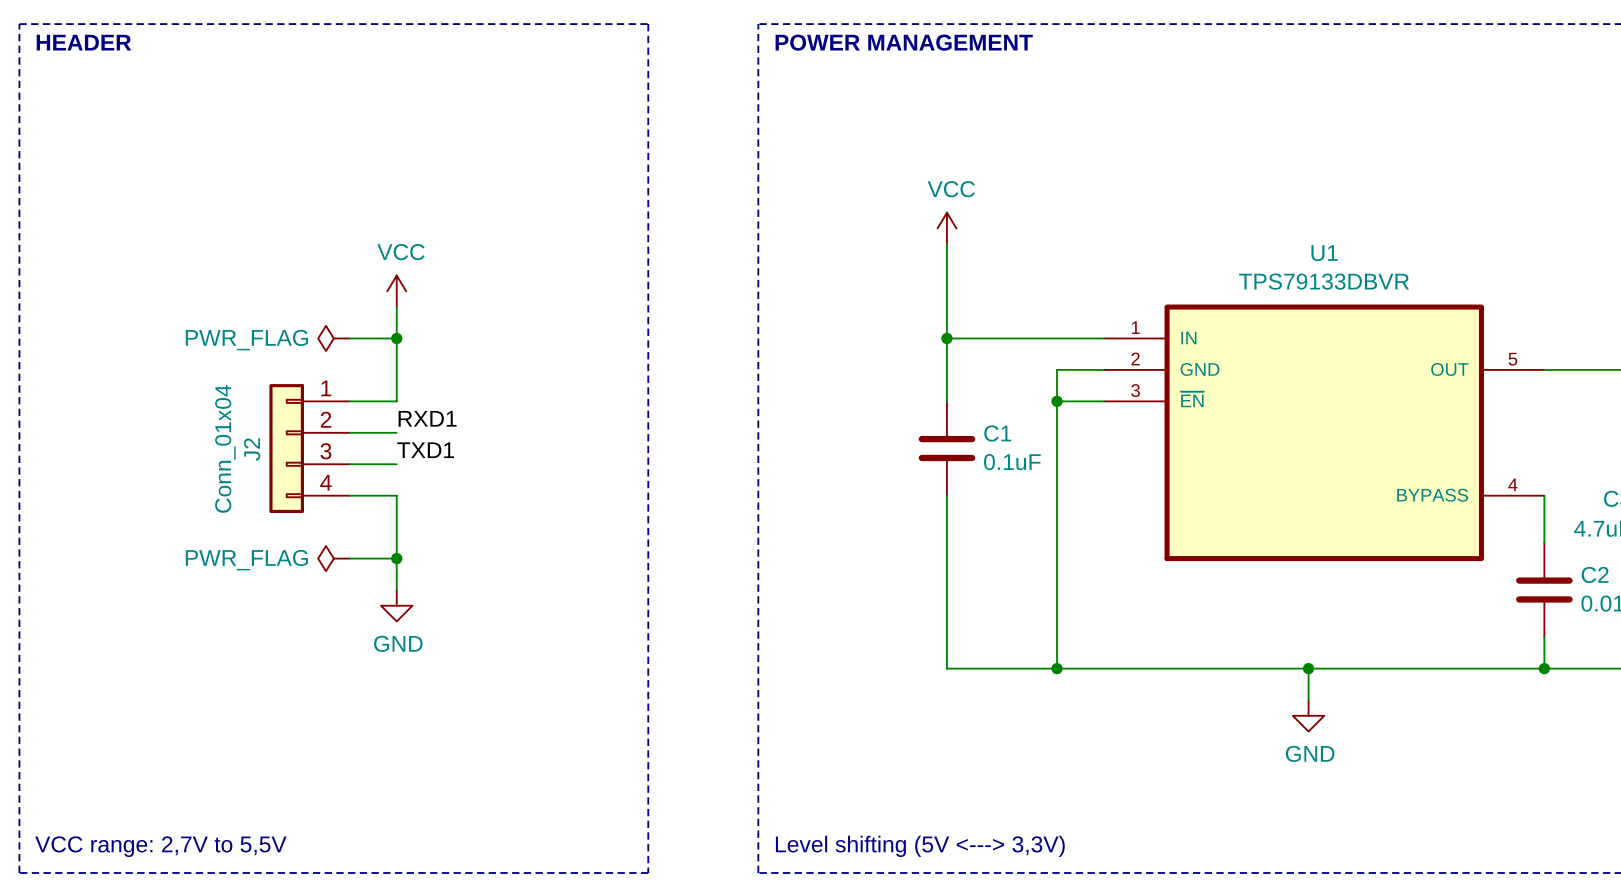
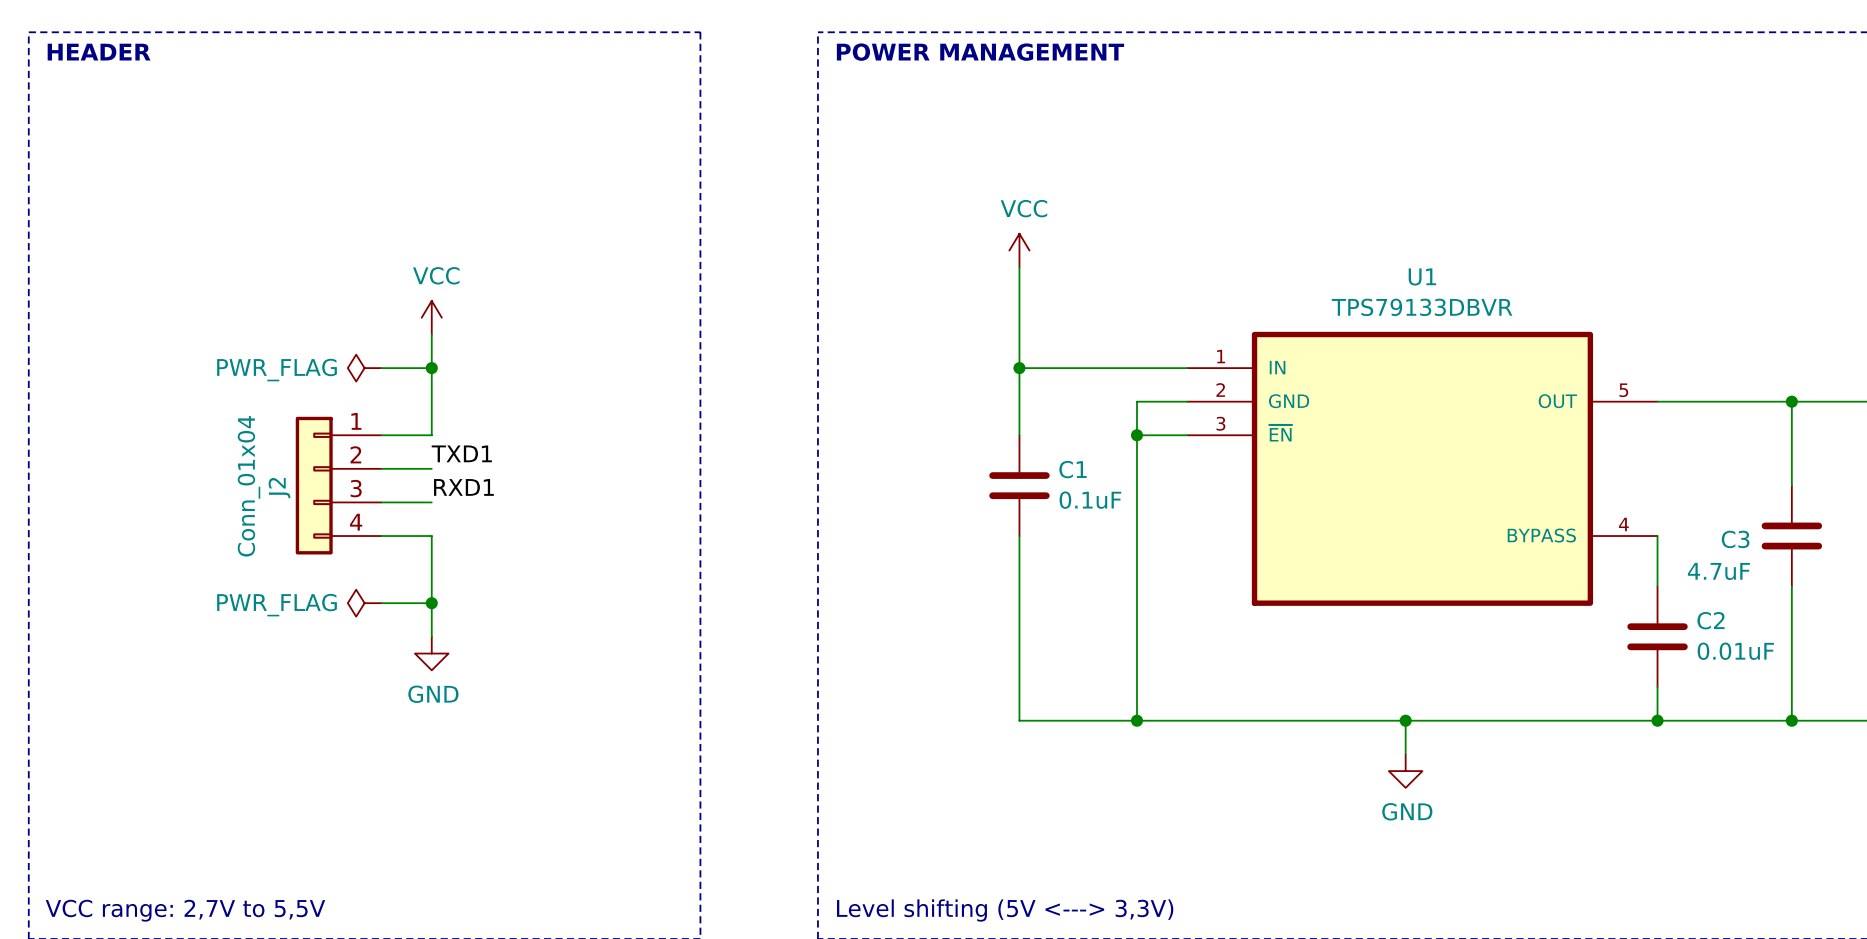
label: RXD1 (427, 418) -> TXD1 (461, 453)
label: TXD1 (425, 450) -> RXD1 (463, 487)

